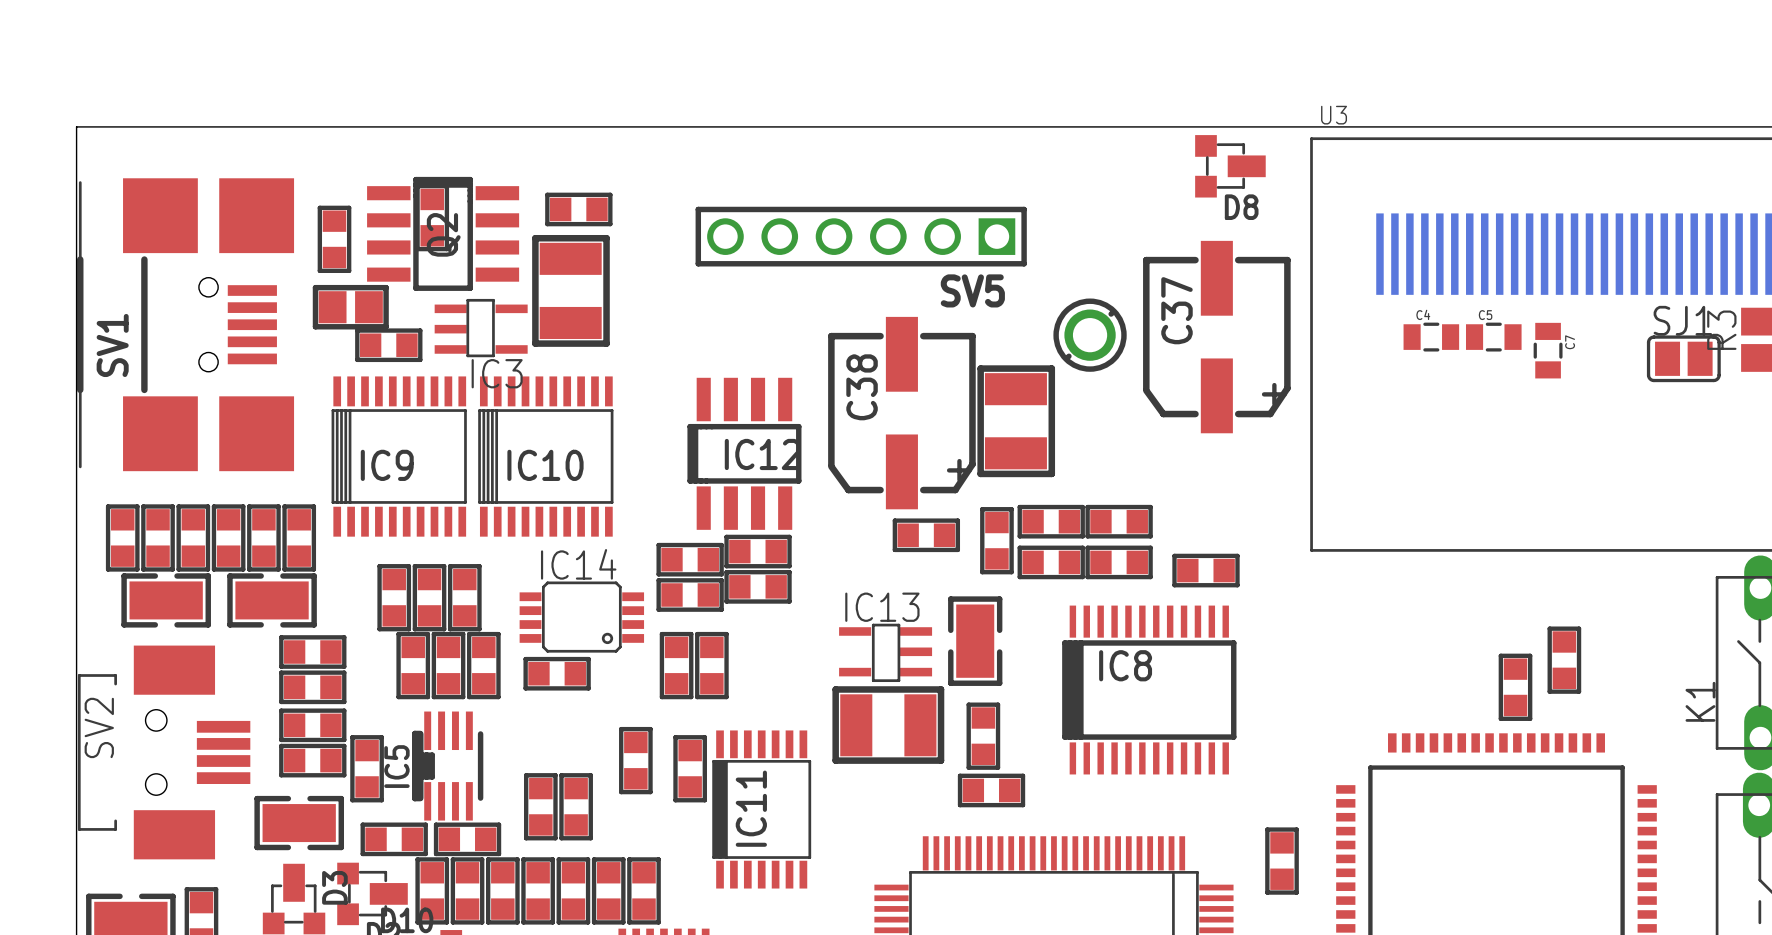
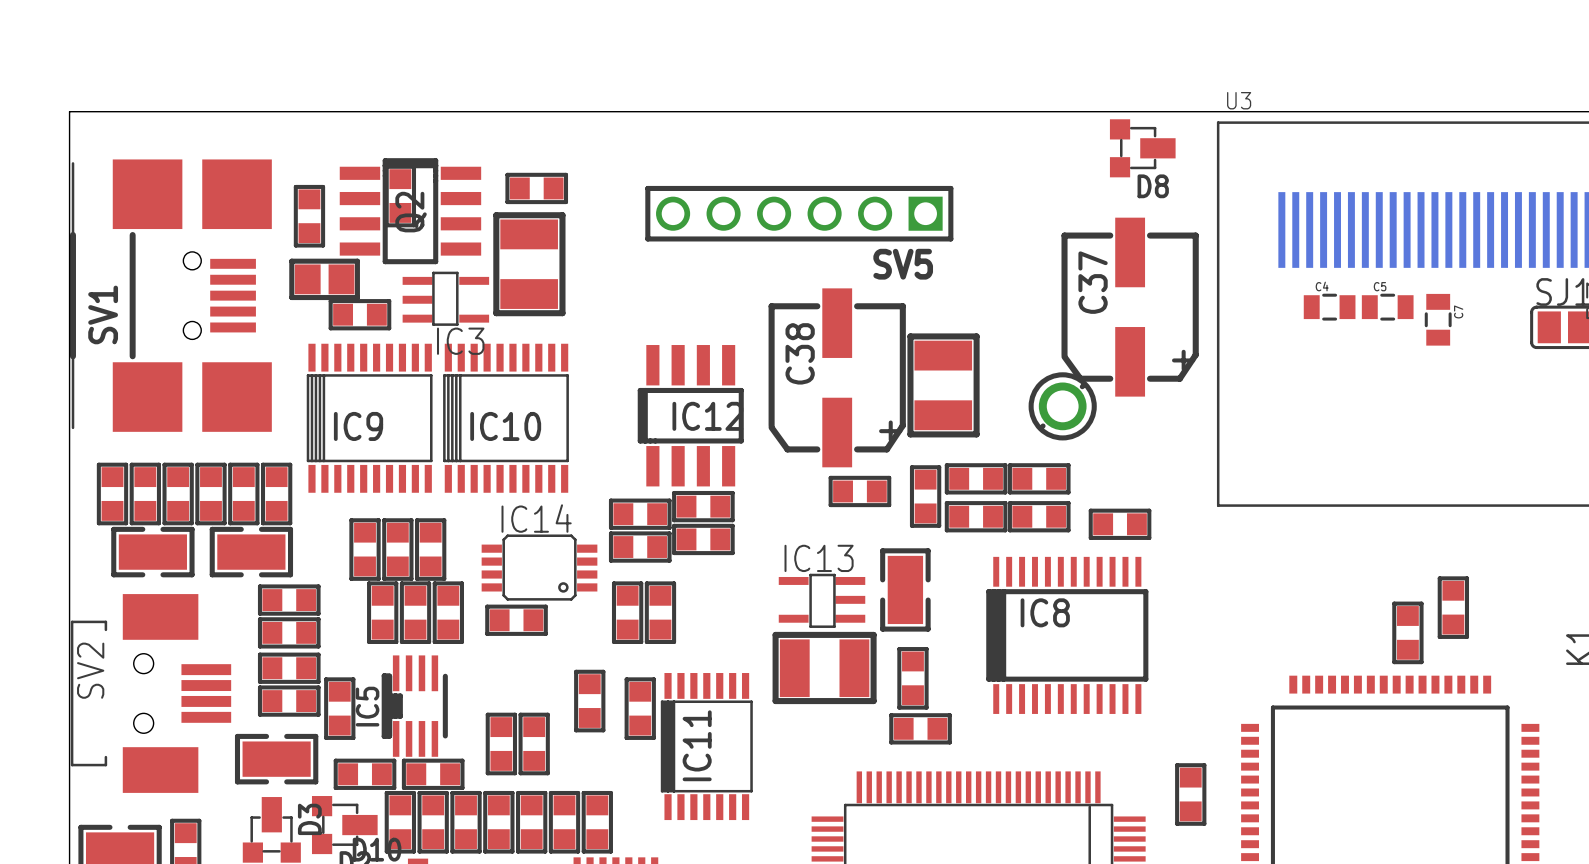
part position: (1090, 335) -> (1062, 406)

